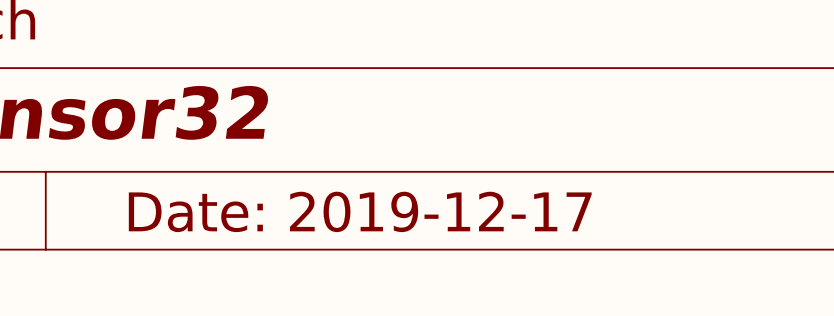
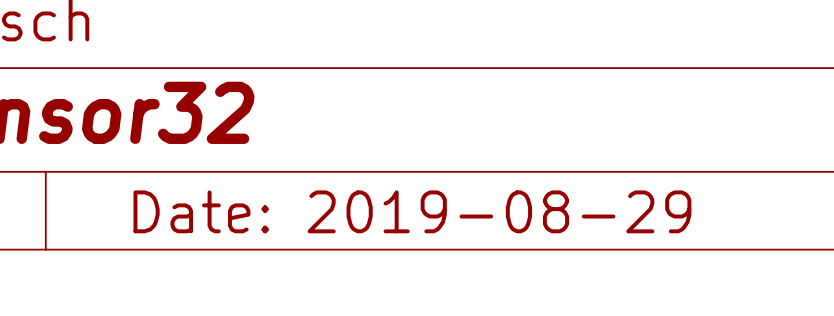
title block: Date: 2019-12-17 (360, 211) -> Date: 2019-08-29 (412, 211)

